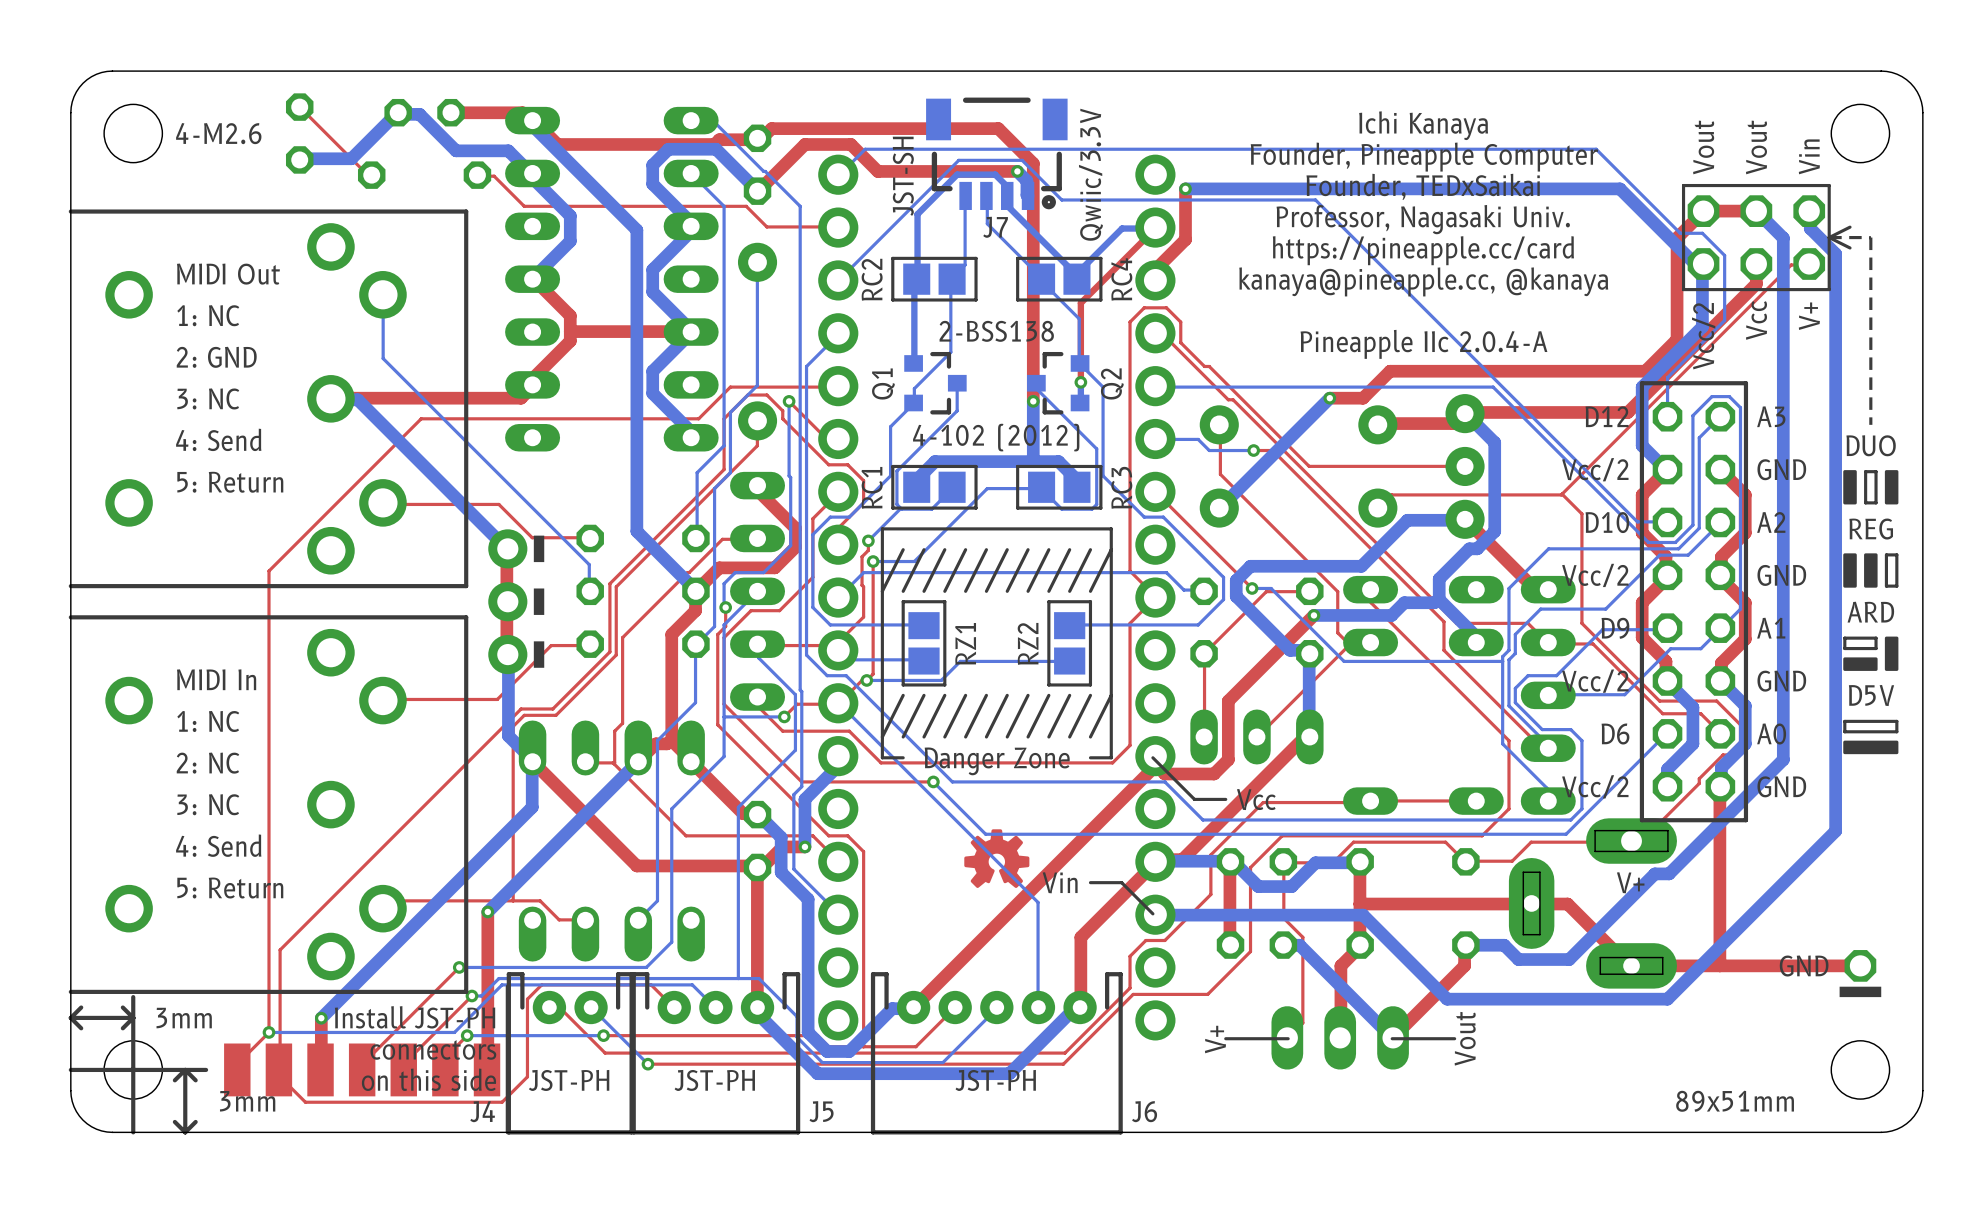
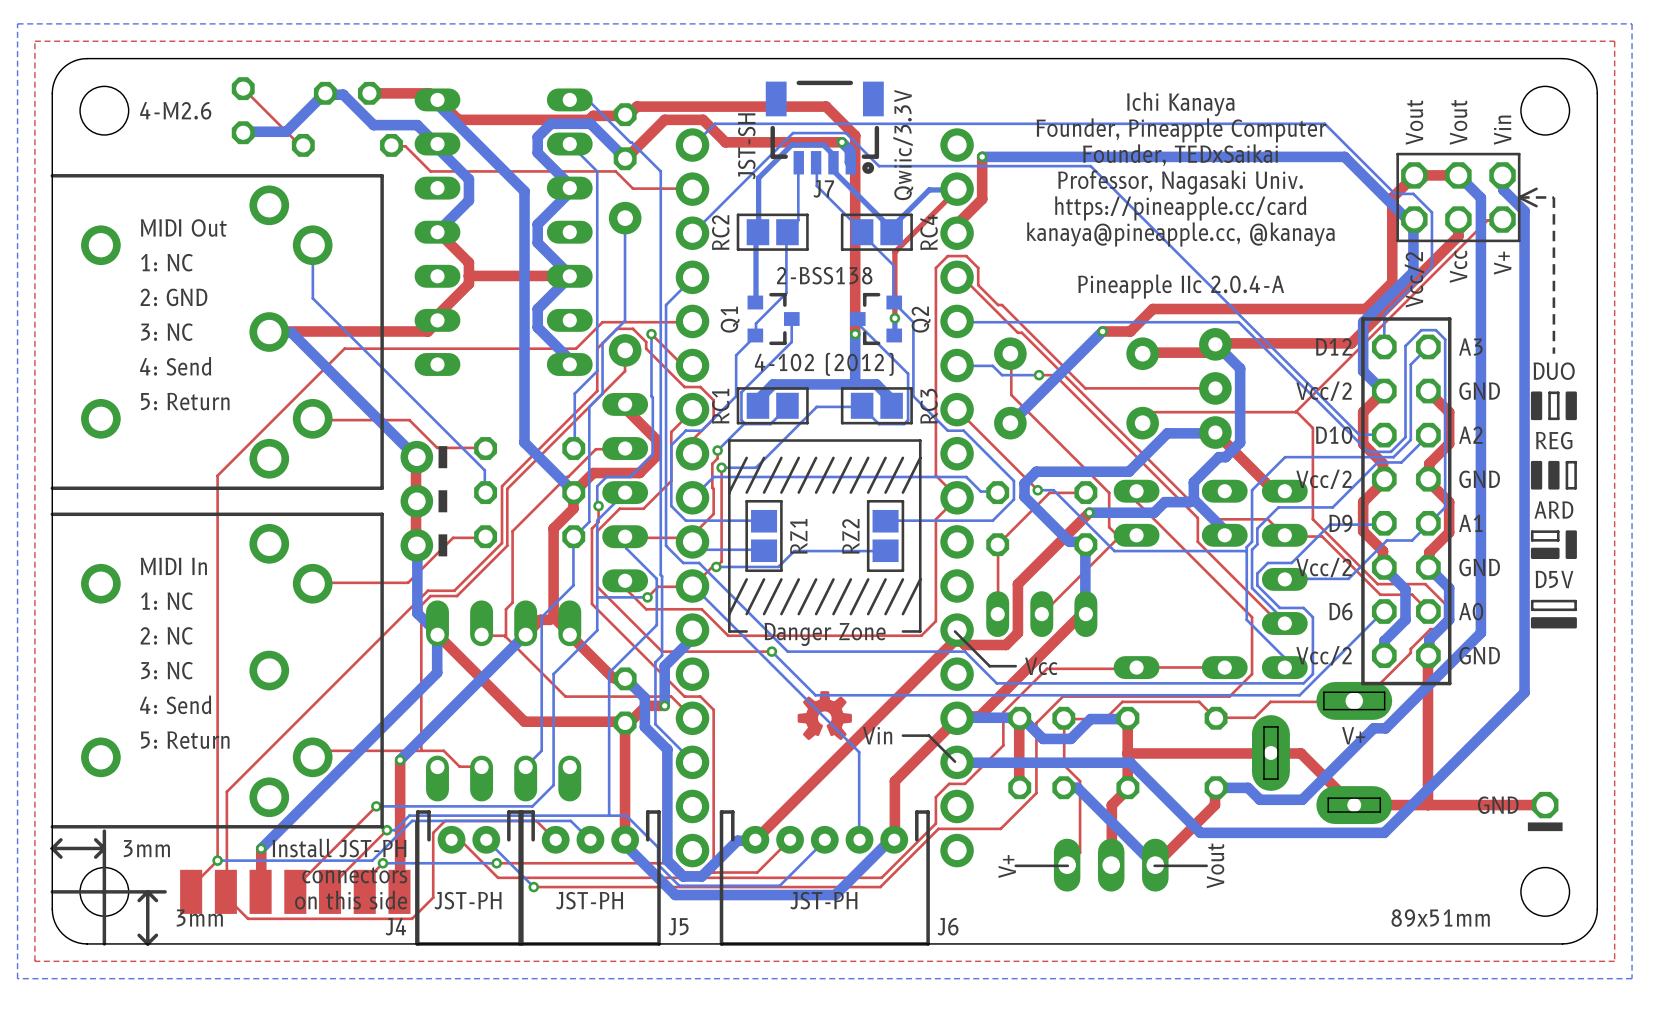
bottom zone outline: none -> (1632, 23) (17, 23) (17, 978) (1632, 978) (1632, 23)
top zone outline: none -> (1614, 41) (34, 41) (34, 961) (1614, 961) (1614, 41)

